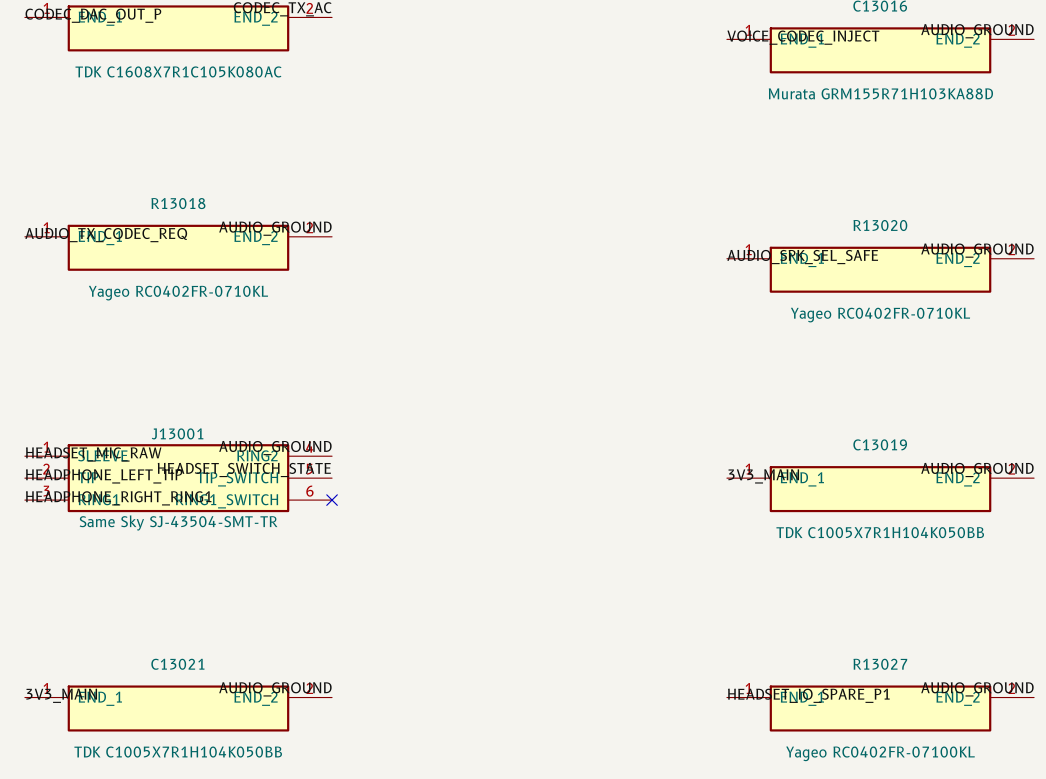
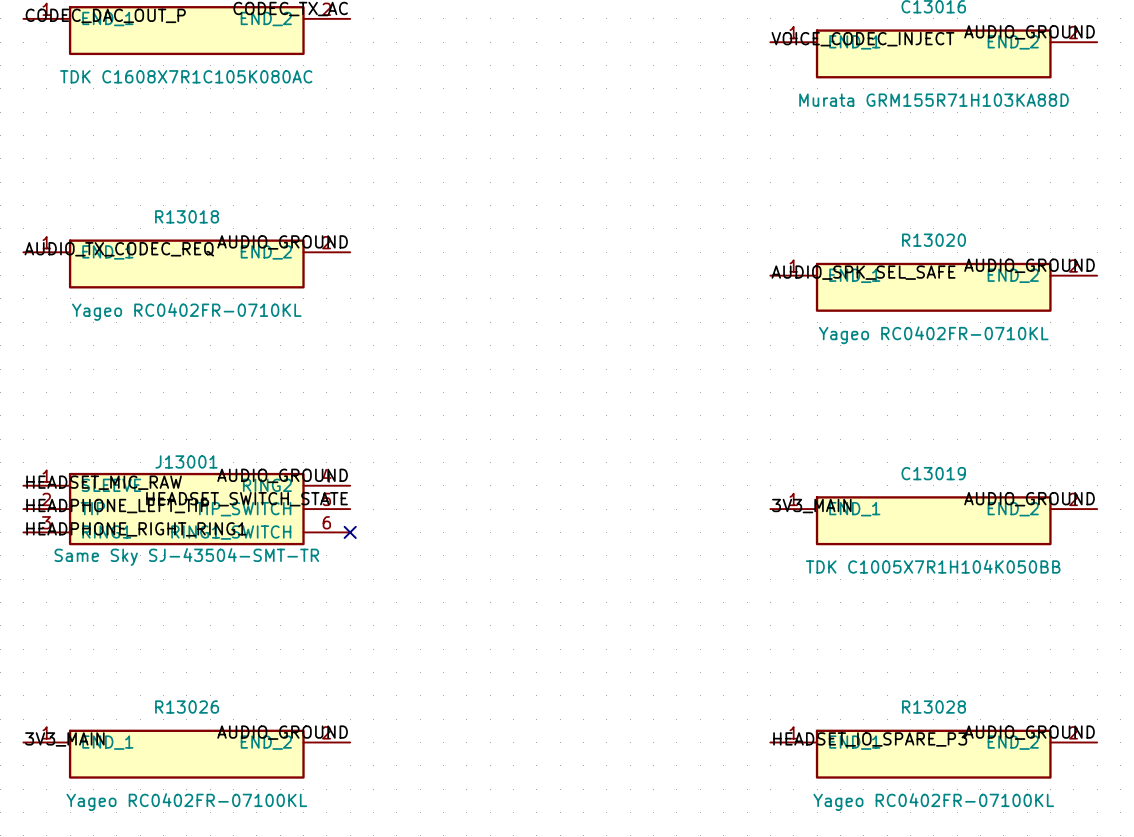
C13021 name: C13021 (177, 664) -> R13026 (187, 707)
R13027 name: R13027 (880, 664) -> R13028 (934, 707)
label: HEADSET_IO_SPARE_P1 (808, 695) -> HEADSET_IO_SPARE_P3 (870, 739)
C13021 value: TDK C1005X7R1H104K050BB (178, 752) -> Yageo RC0402FR-07100KL (186, 802)

